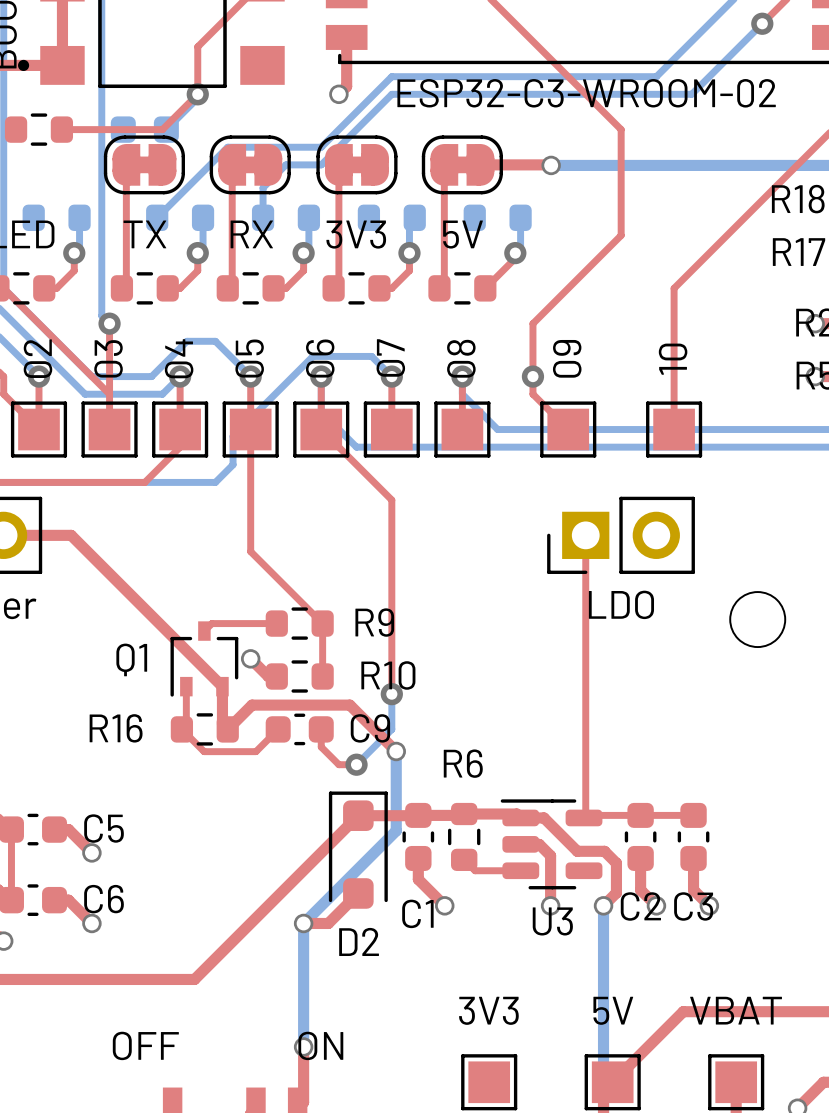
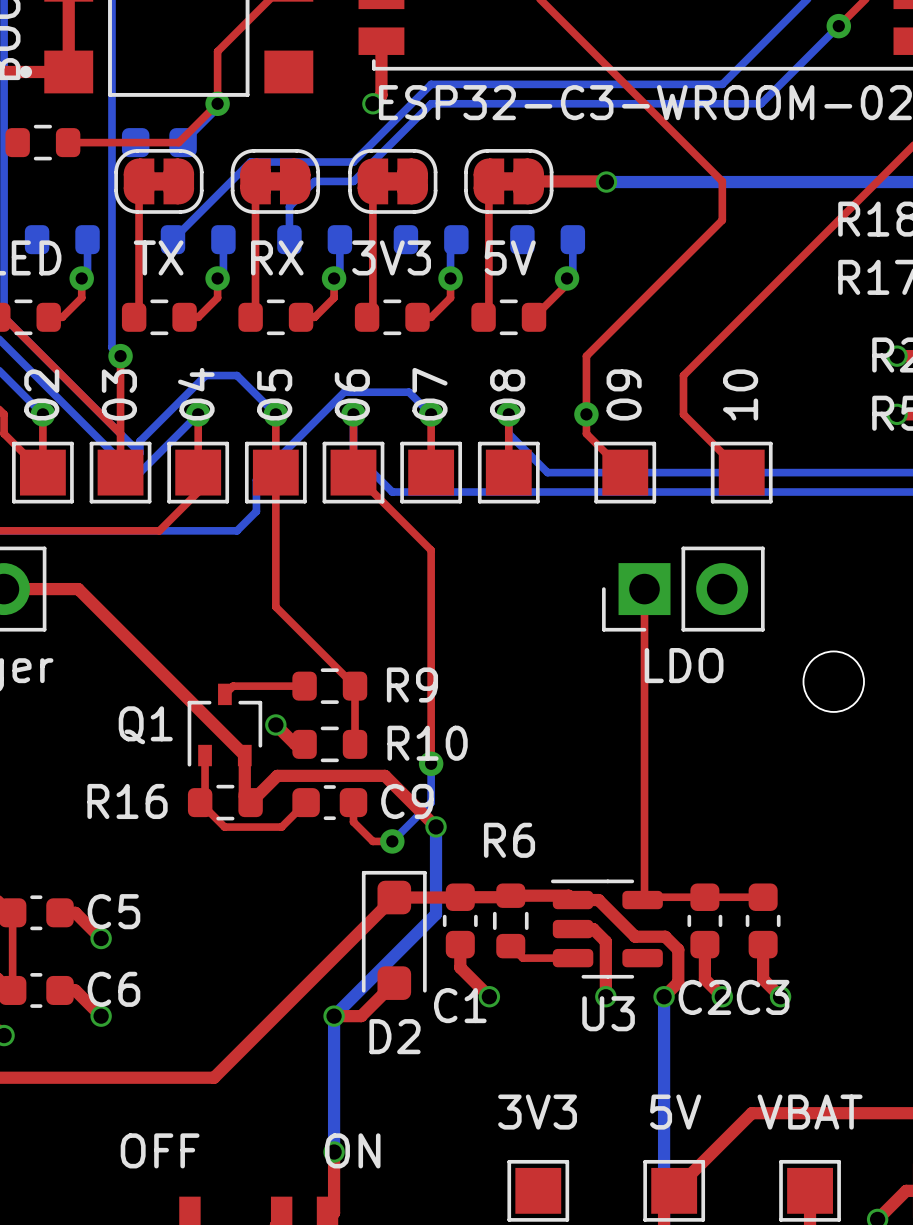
top track: (621, 129) (621, 235) -> (683, 142) (722, 181) (722, 220) (683, 259)
top track: (674, 288) (674, 429) -> (741, 317) (683, 375) (683, 414) (741, 472)
bottom track: (91, 376) (151, 376) -> (101, 414) (139, 453) (139, 441) (166, 414)
bottom track: (85, 394) (162, 394) -> (93, 433) (120, 460) (120, 472) (139, 472) (178, 433)

